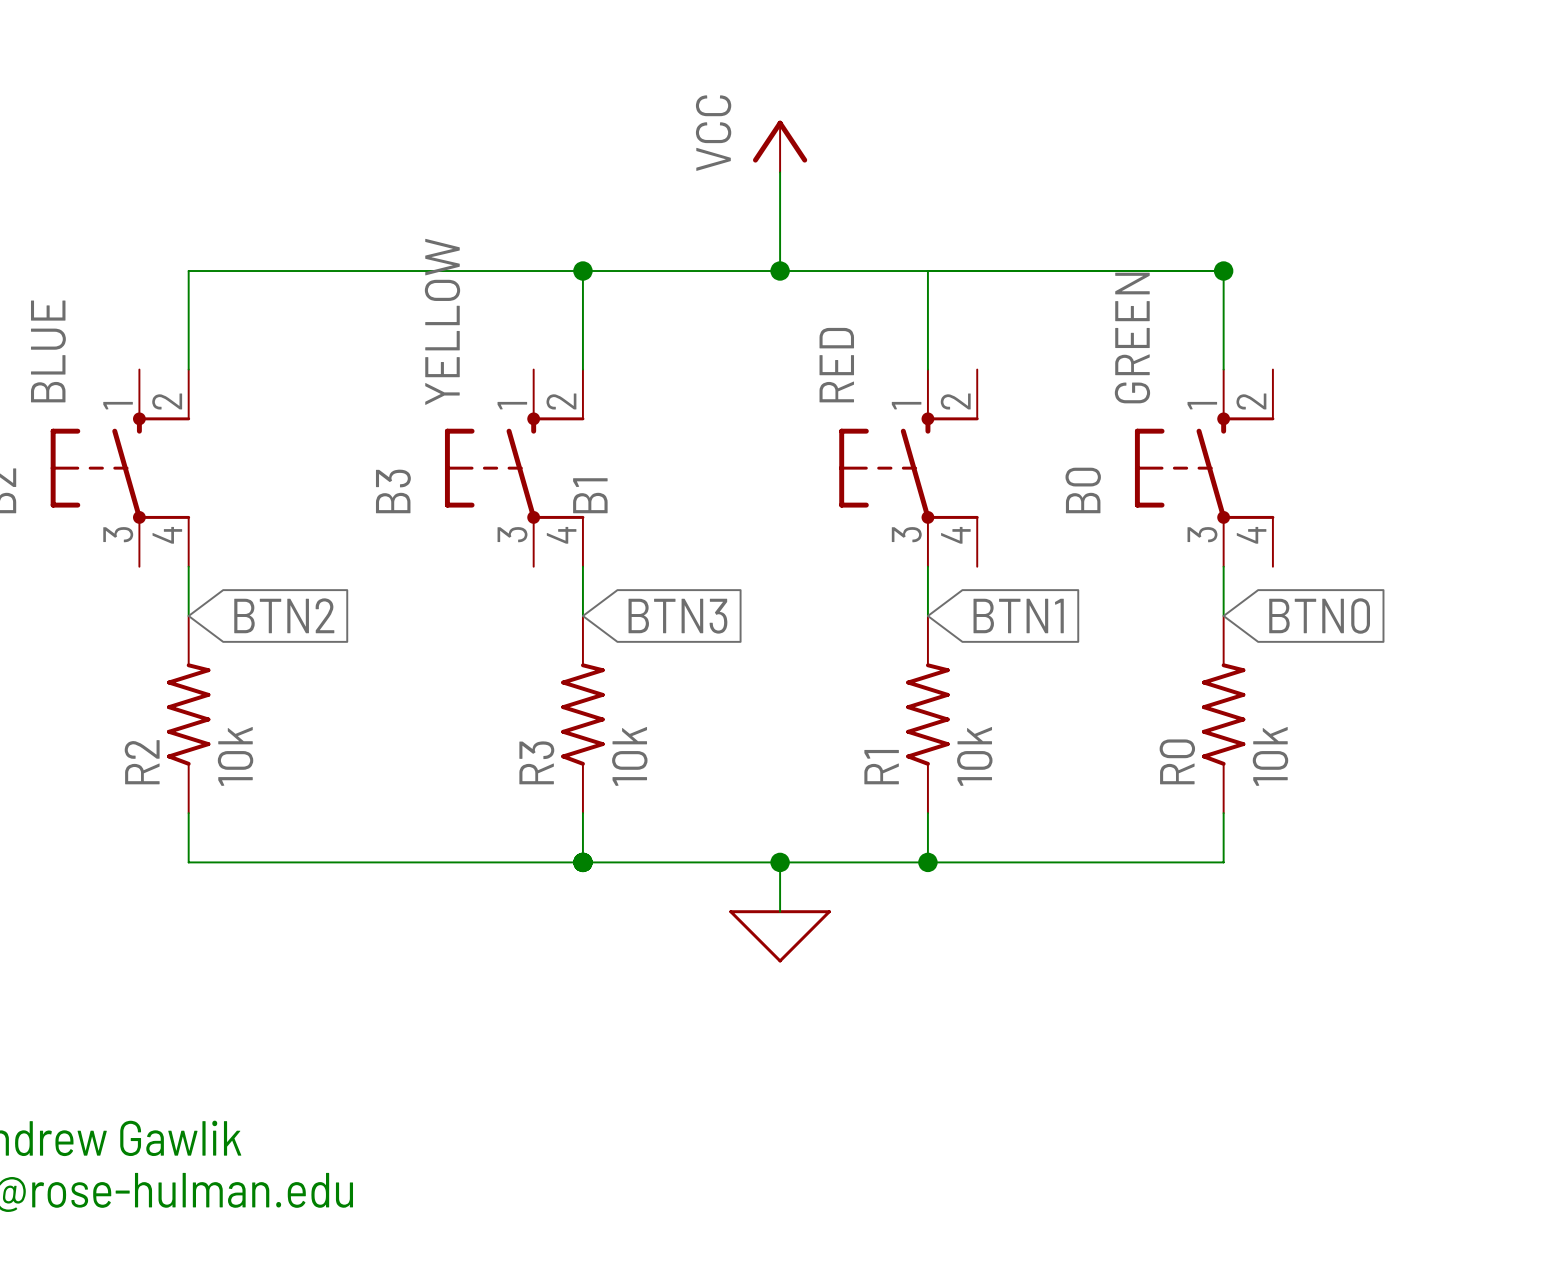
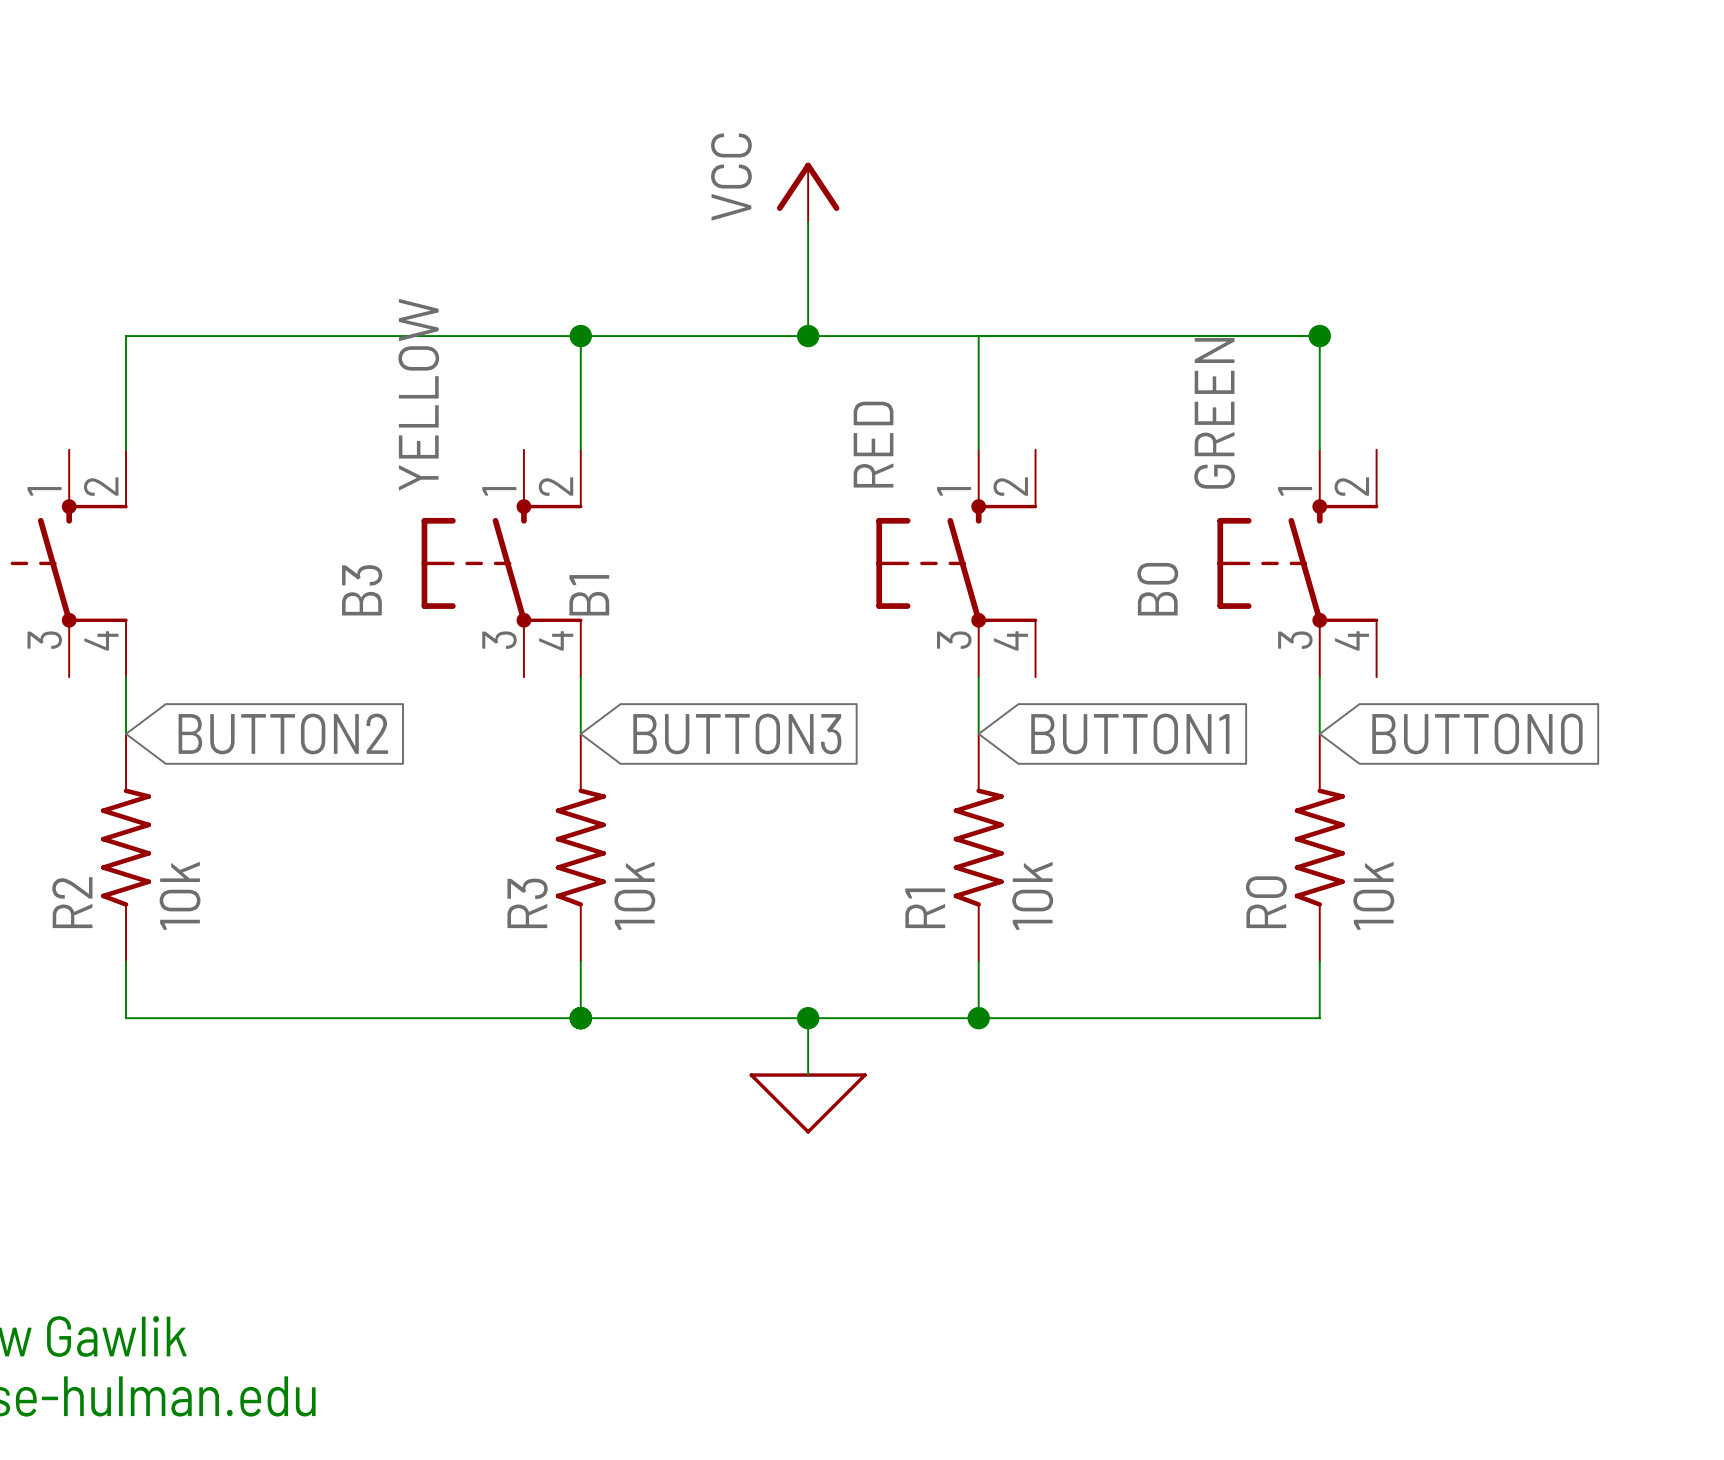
global label: BTN2 (284, 615) -> BUTTON2 (283, 733)
global label: BTN1 (1018, 615) -> BUTTON1 (1130, 733)
global label: BTN3 (677, 616) -> BUTTON3 (737, 733)
global label: BTN0 (1319, 616) -> BUTTON0 (1477, 733)

